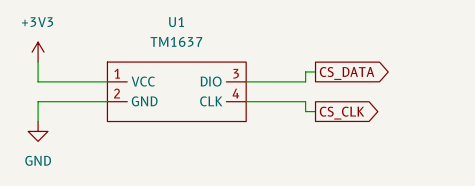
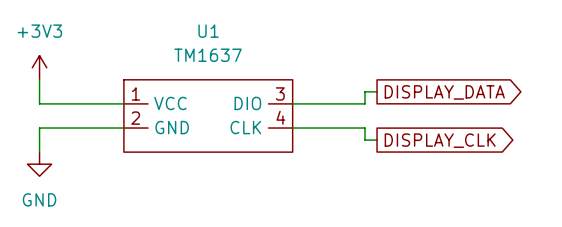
global label: CS_DATA (347, 73) -> DISPLAY_DATA (444, 92)
global label: CS_CLK (341, 113) -> DISPLAY_CLK (440, 140)

